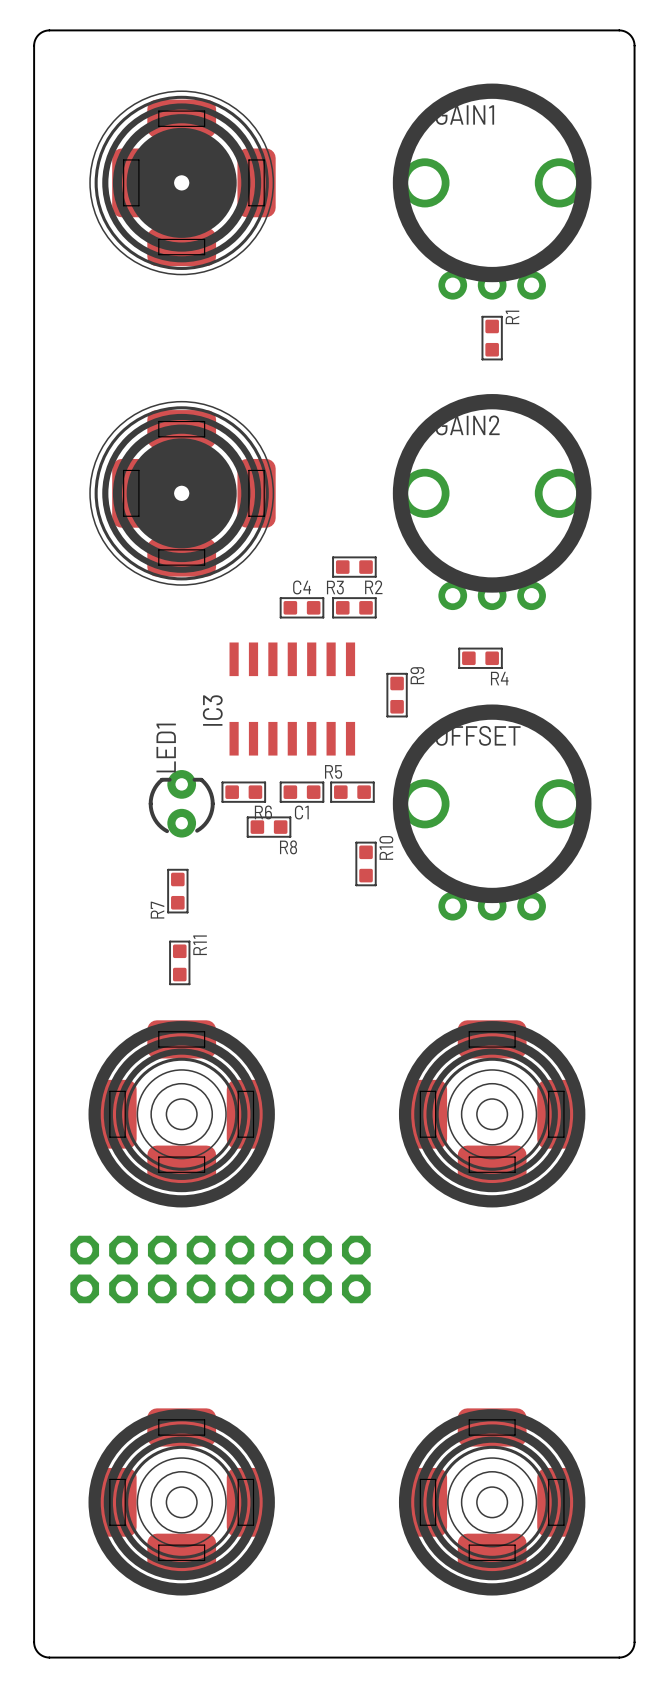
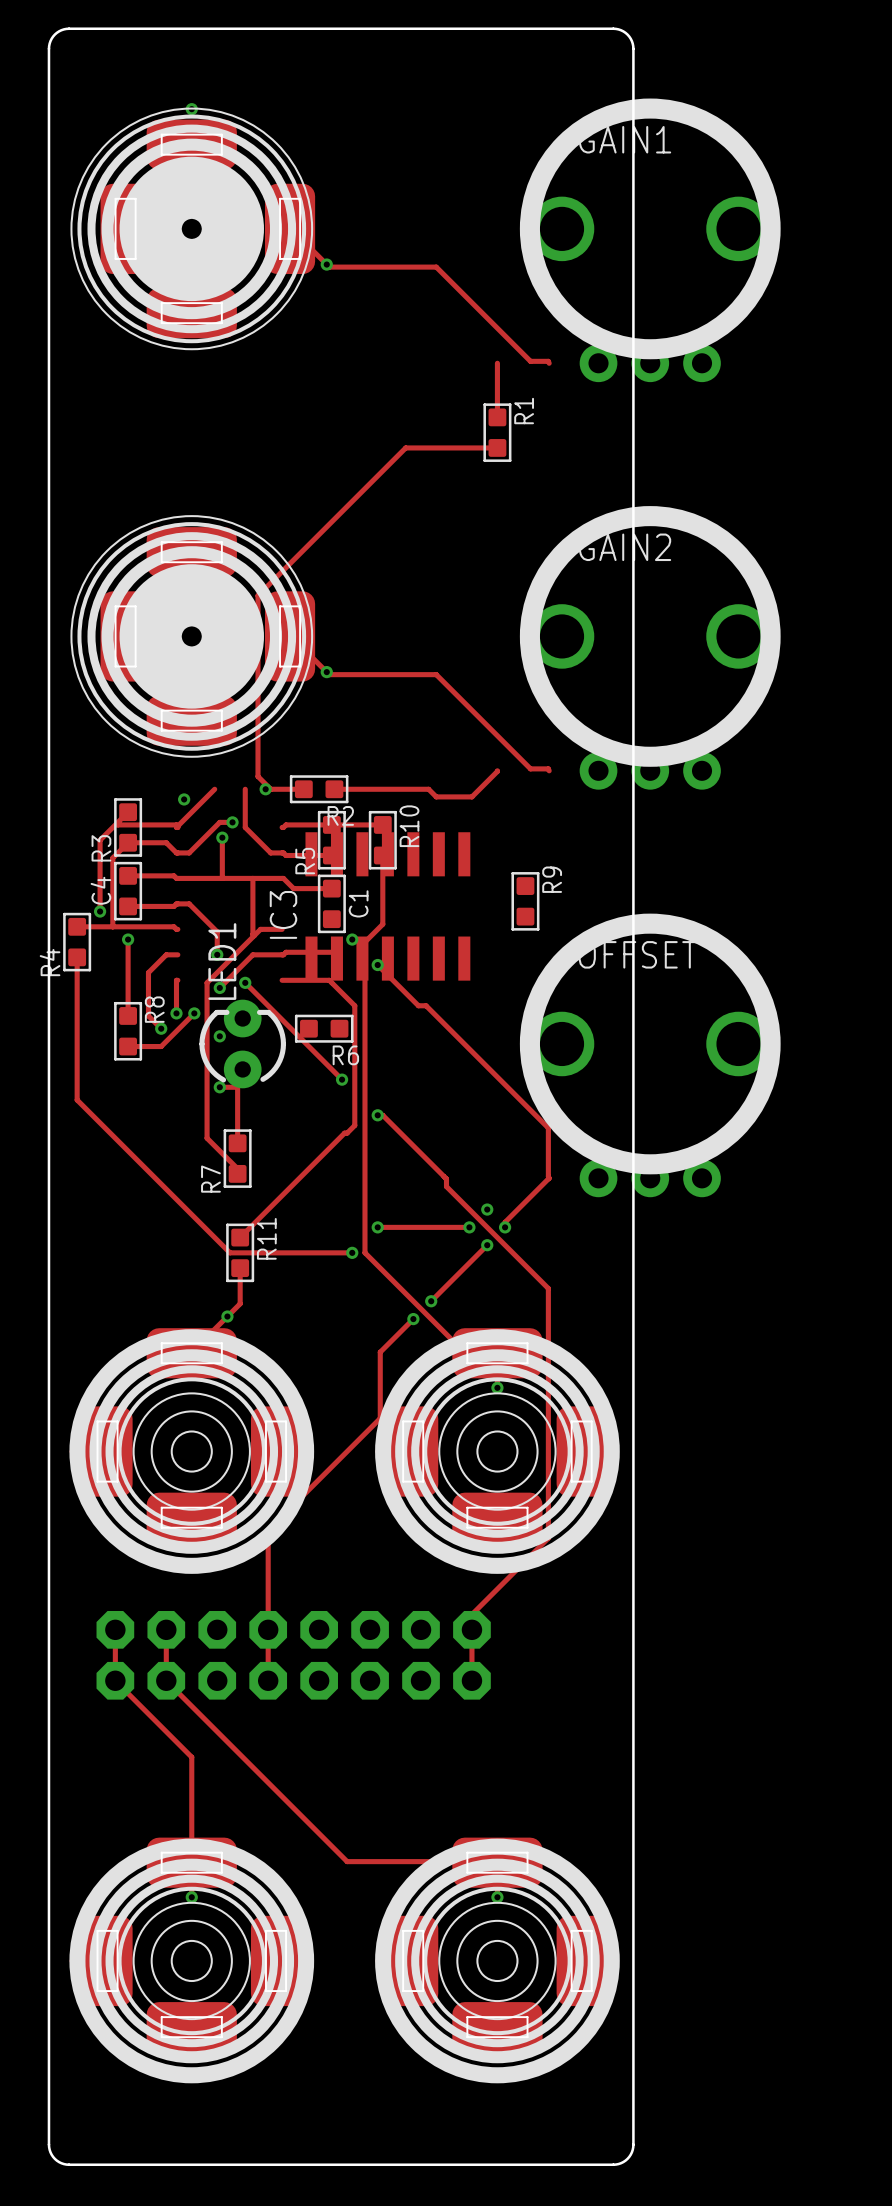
drawing: [33, 29, 636, 1659] -> none
drawing: none -> [47, 27, 635, 2167]
via: none -> (191, 109)
part position: (182, 182) -> (192, 228)
track: none -> (290, 228) (329, 267) (436, 267) (530, 361) (548, 361) (549, 363)
via: none -> (326, 264)
track: none -> (497, 363) (497, 417)
R1 position: (492, 338) -> (497, 432)
track: none -> (497, 447) (405, 447) (258, 595) (258, 776) (270, 789)
part position: (182, 493) -> (192, 636)
track: none -> (290, 636) (329, 674) (436, 674) (530, 768) (548, 768) (549, 770)
via: none -> (326, 672)
R2 position: (354, 567) -> (319, 789)
R3 name position: R3 (335, 587) -> R3 (101, 848)
track: none -> (497, 770) (471, 796) (436, 796) (428, 789) (334, 789)
C4 rotation: 0° (302, 607) -> 90° clockwise (128, 891)
C4 position: (302, 607) -> (128, 891)
R3 rotation: 0° (354, 607) -> 90° clockwise (128, 827)
R3 position: (354, 607) -> (128, 827)
track: none -> (214, 789) (177, 827) (176, 824) (116, 823)
track: none -> (245, 789) (245, 827) (270, 852) (283, 852) (286, 855) (331, 855)
track: none -> (265, 789) (303, 789)
via: none -> (265, 789)
via: none -> (184, 799)
track: none -> (128, 812) (100, 840) (100, 911)
track: none -> (232, 822) (219, 822) (189, 852) (176, 852) (166, 842) (128, 842) (112, 858) (112, 926)
via: none -> (232, 822)
track: none -> (382, 824) (286, 824) (282, 827)
track: none -> (222, 837) (222, 878)
via: none -> (222, 837)
R4 rotation: 0° (480, 658) -> 90° clockwise (77, 942)
R4 position: (480, 658) -> (77, 942)
track: none -> (382, 855) (382, 924) (364, 942) (364, 1252) (464, 1352) (497, 1352) (497, 1387)
track: none -> (128, 875) (173, 875) (176, 878) (283, 878) (293, 888) (331, 888)
track: none -> (252, 878) (254, 935)
track: none -> (128, 906) (173, 906) (176, 903) (189, 903) (217, 931) (217, 954)
via: none -> (100, 911)
track: none -> (77, 926) (173, 926) (177, 929)
track: none -> (282, 929) (260, 929) (207, 982) (207, 1138) (237, 1168) (237, 1173)
track: none -> (128, 939) (128, 1015)
via: none -> (128, 939)
via: none -> (352, 939)
track: none -> (331, 952) (252, 954) (219, 987)
track: none -> (177, 954) (166, 954) (148, 972) (148, 1015) (161, 1028)
via: none -> (217, 954)
track: none -> (77, 957) (77, 1100) (229, 1252) (352, 1252)
track: none -> (377, 965) (418, 1005) (426, 1005) (548, 1128) (549, 1178) (505, 1222) (505, 1227)
via: none -> (377, 965)
track: none -> (177, 980) (176, 1013)
track: none -> (282, 980) (329, 980) (354, 1005) (354, 1125) (347, 1133) (344, 1133) (240, 1237)
track: none -> (245, 982) (342, 1079)
via: none -> (245, 982)
via: none -> (219, 987)
R5 name position: R5 (333, 771) -> R5 (305, 861)
via: none -> (176, 1013)
track: none -> (194, 1013) (161, 1046) (128, 1046)
via: none -> (194, 1013)
via: none -> (161, 1028)
C1 rotation: 0° (302, 792) -> 90° clockwise (331, 903)
C1 position: (302, 792) -> (331, 903)
R5 rotation: 0° (352, 792) -> 90° clockwise (331, 840)
R5 position: (352, 792) -> (331, 840)
via: none -> (219, 1036)
R8 rotation: 0° (269, 827) -> 90° clockwise (128, 1031)
R8 position: (269, 827) -> (128, 1031)
via: none -> (342, 1079)
track: none -> (219, 1087) (237, 1087) (242, 1069) (237, 1074) (237, 1143)
via: none -> (219, 1087)
R8 name position: R8 (288, 847) -> R8 (154, 1009)
track: none -> (377, 1115) (382, 1115) (446, 1178) (446, 1186) (548, 1288) (548, 1538) (471, 1614) (471, 1680)
via: none -> (377, 1115)
R10 position: (366, 863) -> (382, 840)
via: none -> (487, 1209)
track: none -> (377, 1227) (469, 1227)
via: none -> (377, 1227)
via: none -> (469, 1227)
via: none -> (505, 1227)
track: none -> (487, 1245) (431, 1301)
via: none -> (487, 1245)
via: none -> (352, 1252)
track: none -> (240, 1268) (240, 1303) (191, 1353)
via: none -> (431, 1301)
via: none -> (227, 1316)
track: none -> (413, 1319) (380, 1352) (380, 1418) (268, 1530) (268, 1680)
via: none -> (413, 1319)
via: none -> (497, 1387)
part position: (181, 1113) -> (191, 1451)
part: none -> (497, 1451)
part: (492, 1113) -> none
track: none -> (115, 1629) (115, 1680) (191, 1757) (191, 1897)
track: none -> (166, 1629) (166, 1680) (347, 1861) (497, 1861) (497, 1897)
via: none -> (191, 1897)
via: none -> (497, 1897)
part position: (181, 1501) -> (191, 1960)
part: none -> (497, 1960)
part: (492, 1501) -> none

